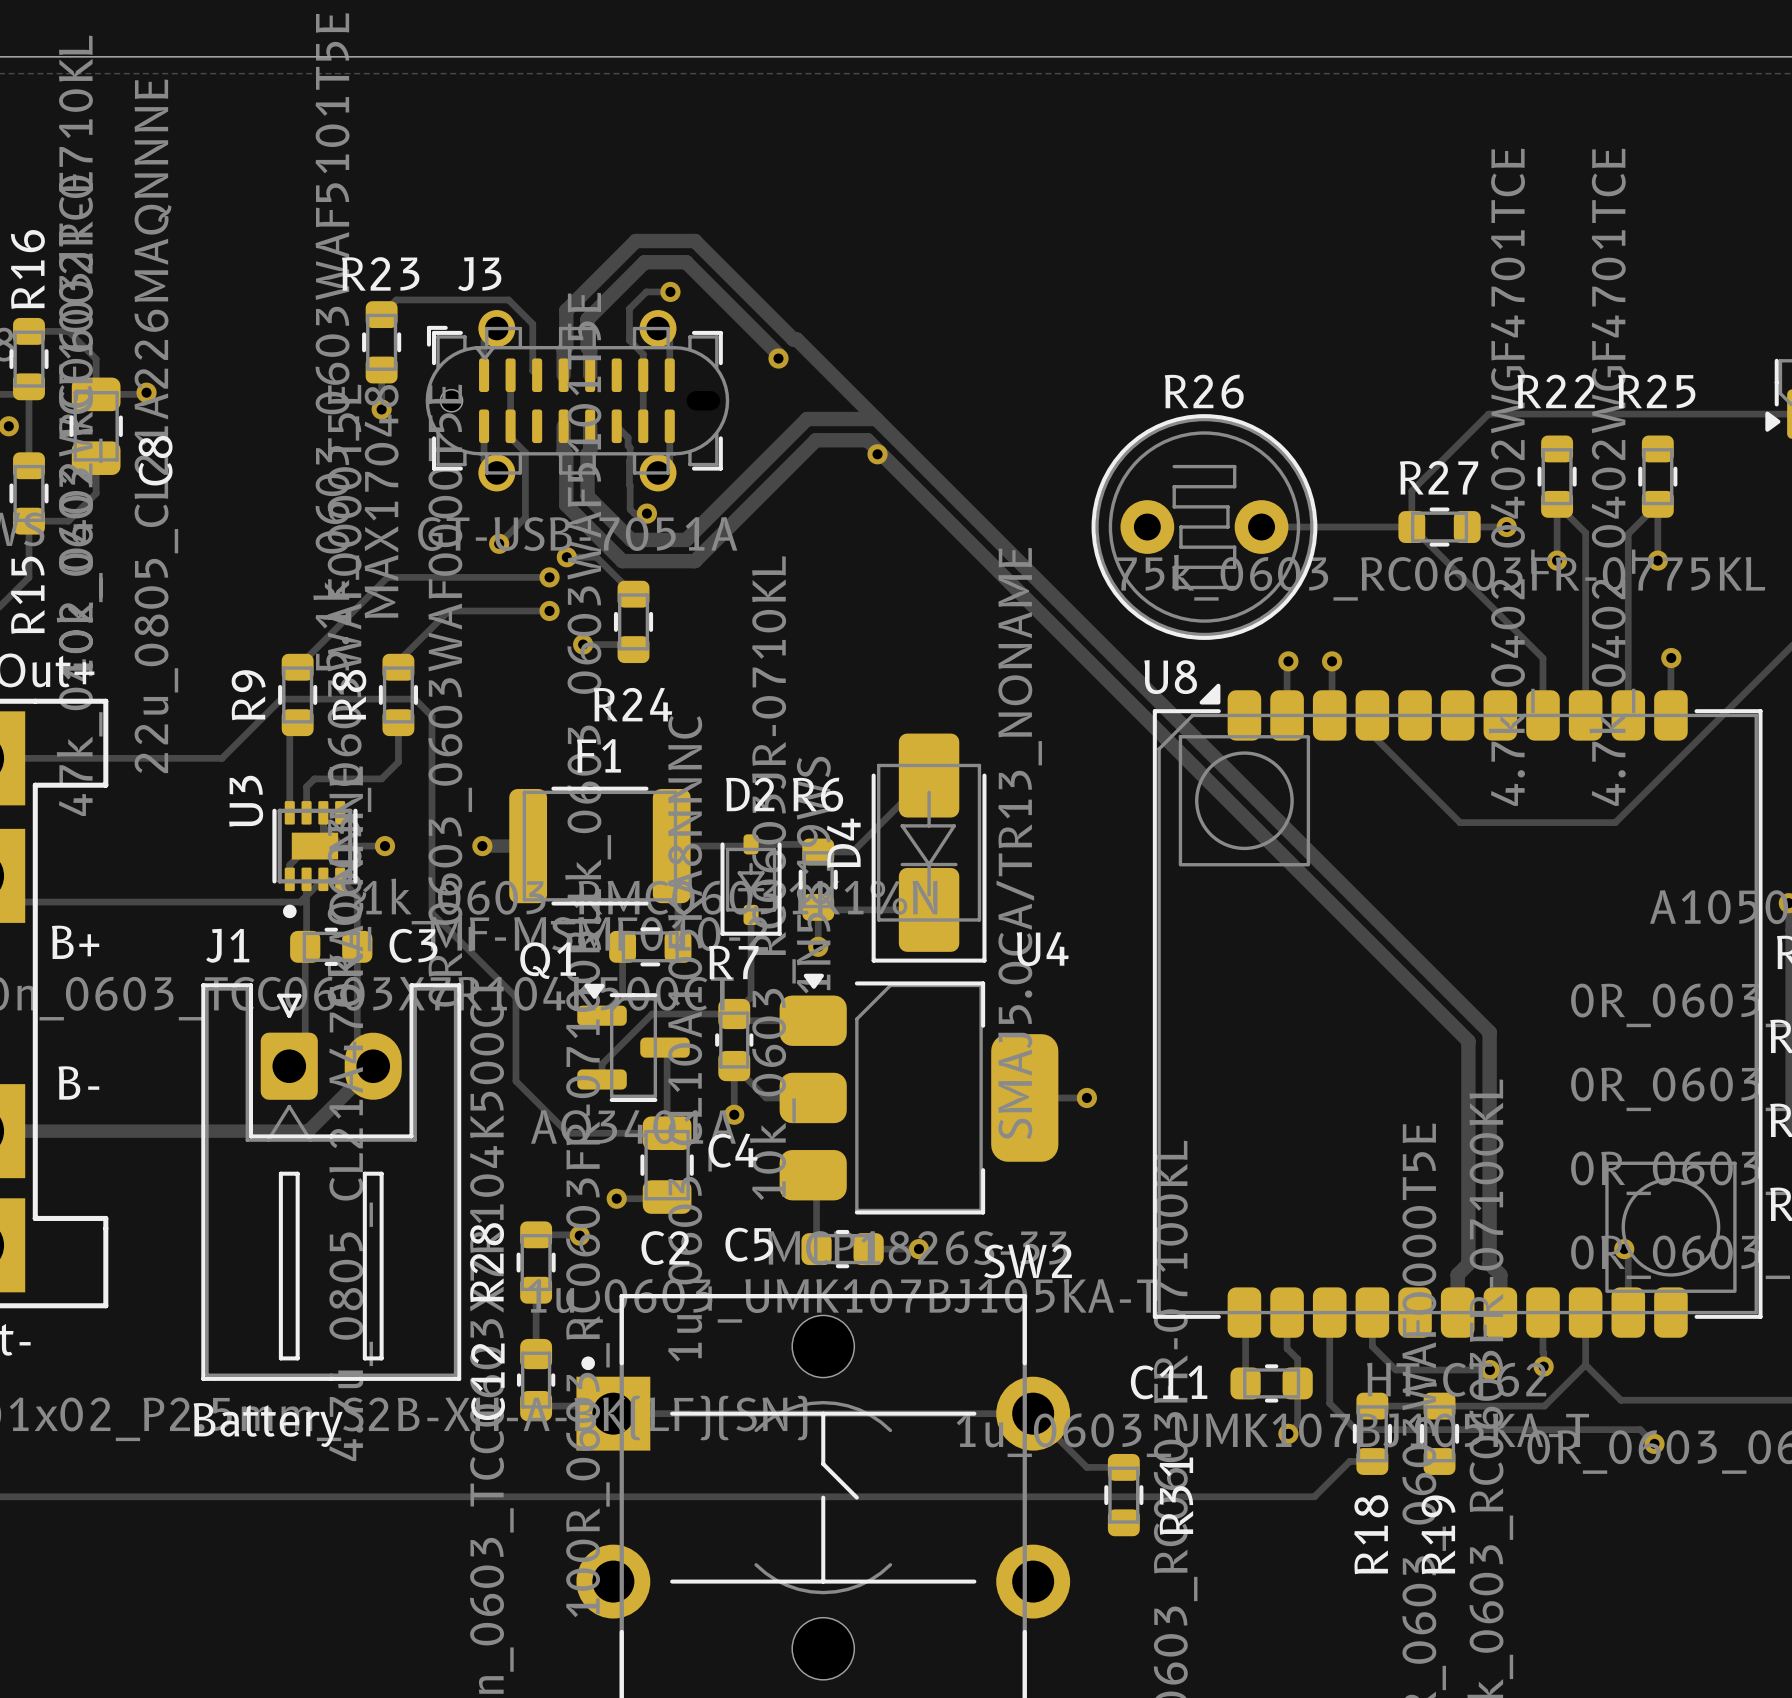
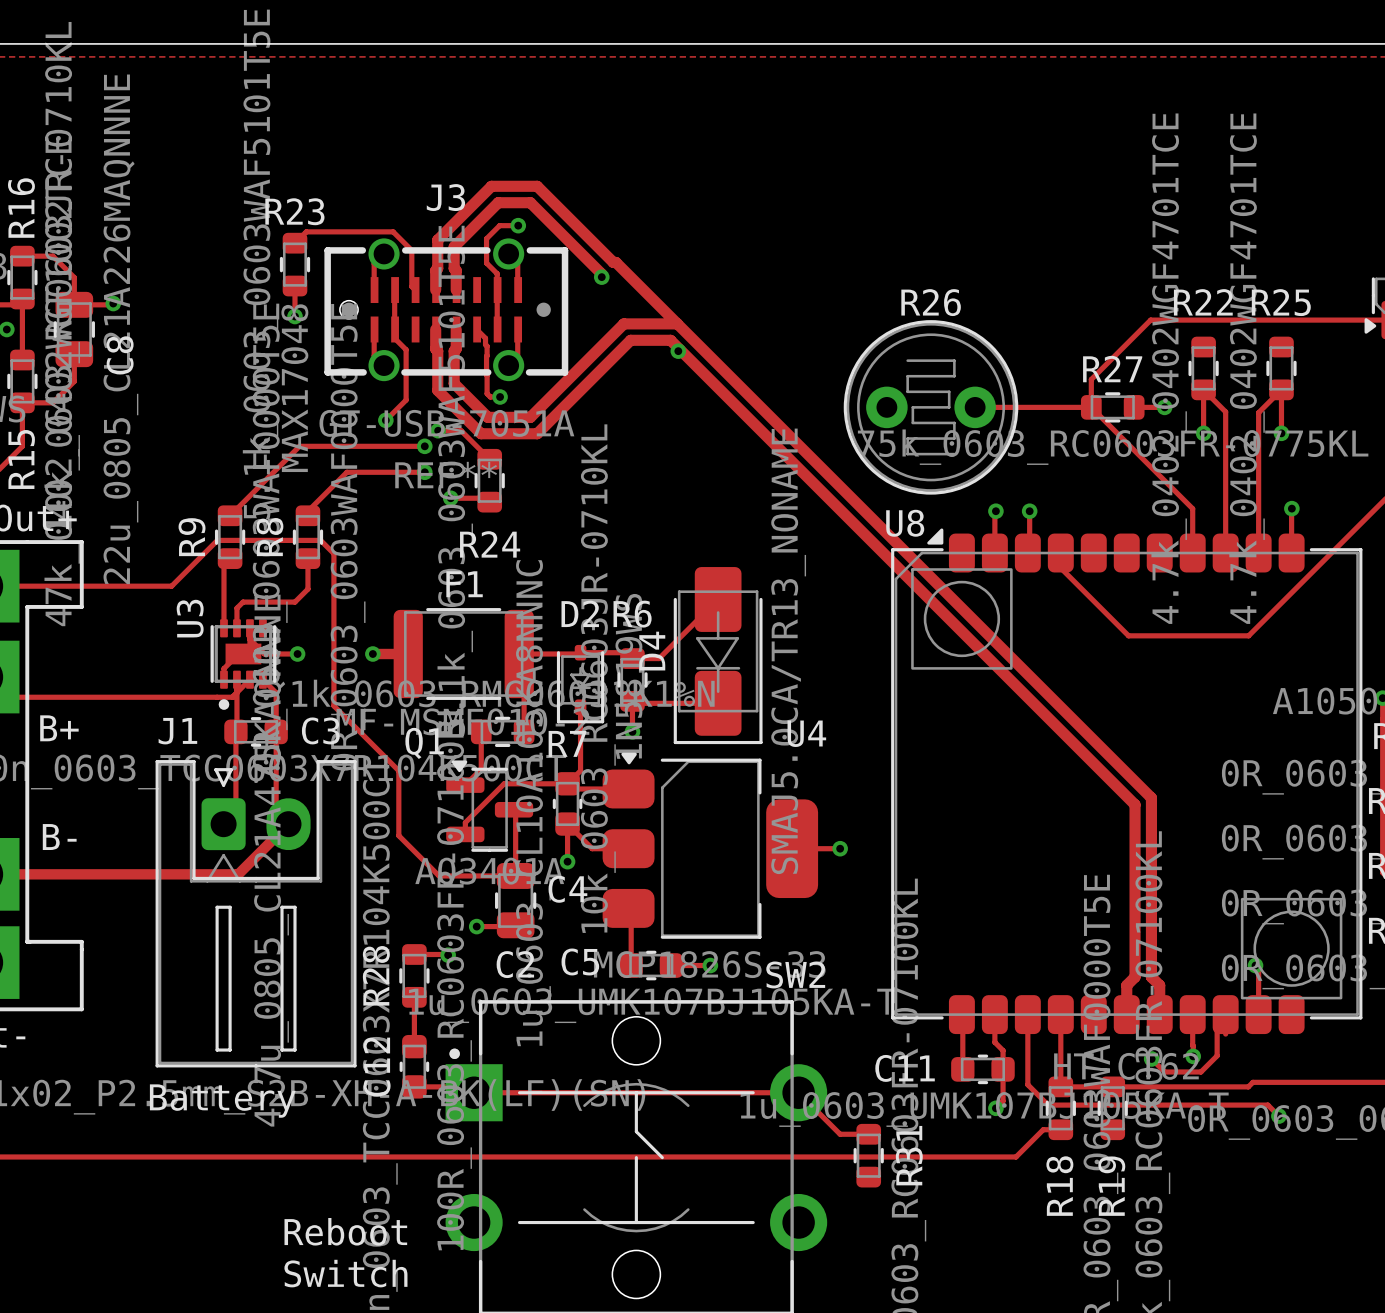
J3 name position: J3 (479, 274) -> J3 (445, 197)
J3 footprint: [425, 310, 730, 492] -> [324, 238, 569, 382]
track: none -> (1225, 1014) (1217, 1023) (1217, 1055) (1200, 1071) (1164, 1071) (1151, 1058)
track: (1585, 1337) (1585, 1364) -> none
track: (1372, 1346) (1395, 1370) (1489, 1370) -> (1060, 1040) (1060, 1086)
track: (1585, 1364) (1544, 1406) -> (1252, 1082) (1248, 1086) (1193, 1086)
track: (1585, 1364) (1620, 1400) -> none
text: none -> Reboot (345, 1231)
text: none -> Switch (345, 1273)

